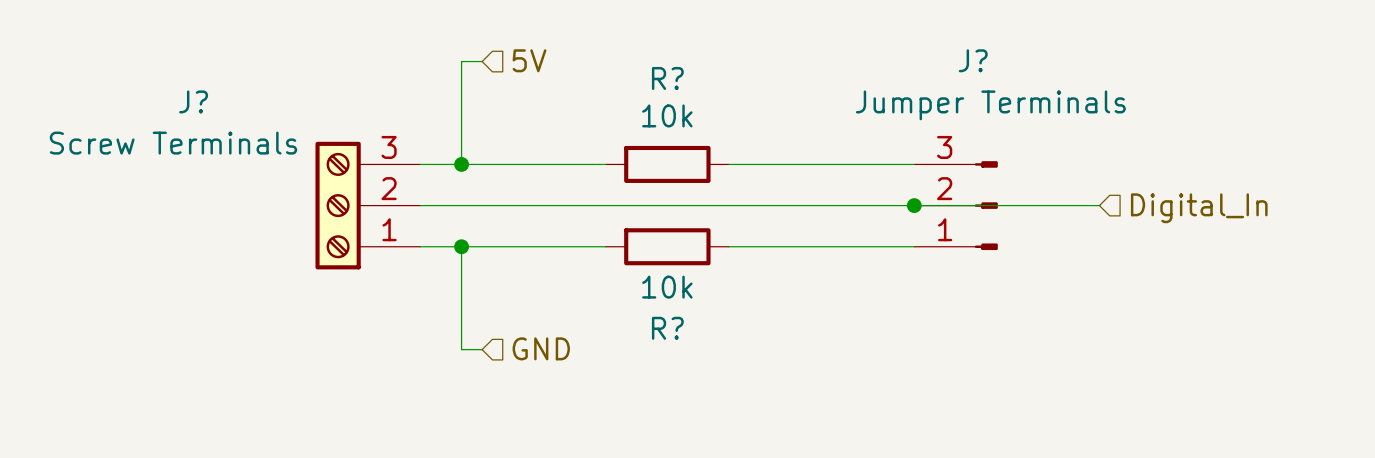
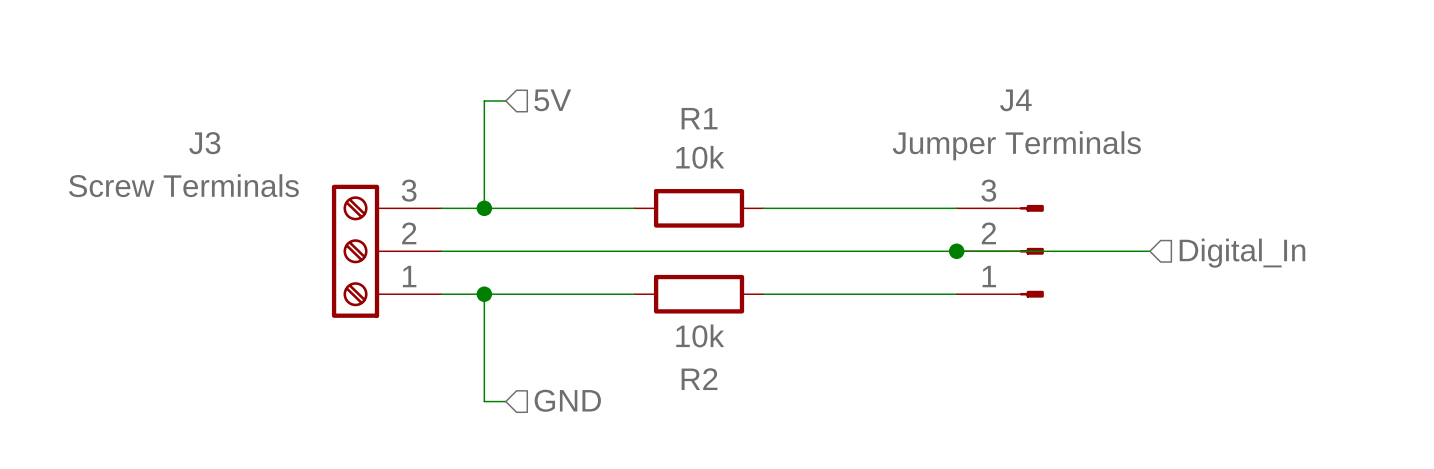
J? name: J? (973, 60) -> J4 (1015, 100)
R? name: R? (667, 78) -> R1 (699, 118)
J? name: J? (193, 101) -> J3 (204, 143)
R? name: R? (667, 328) -> R2 (699, 379)

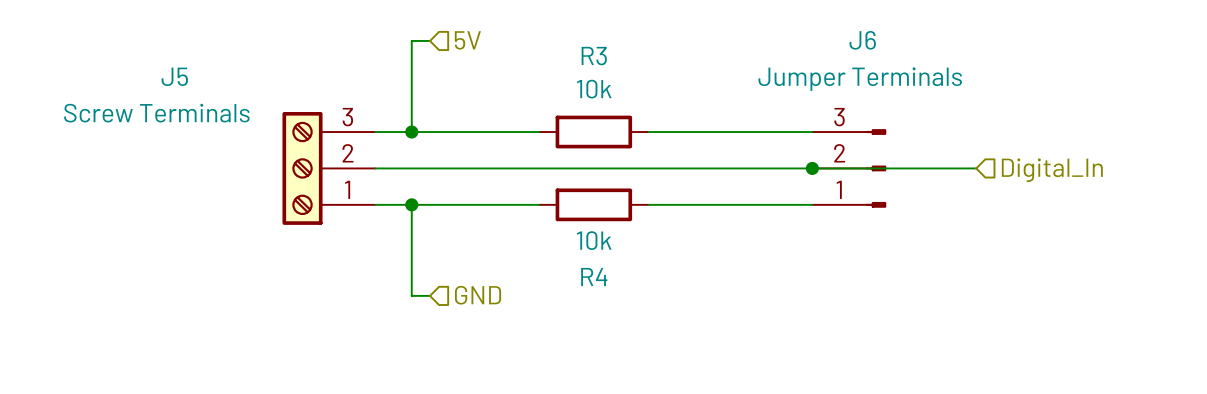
J4 name: J4 (1015, 100) -> J6 (862, 40)
R1 name: R1 (699, 118) -> R3 (594, 56)
J3 name: J3 (204, 143) -> J5 (174, 76)
R2 name: R2 (699, 379) -> R4 (594, 277)

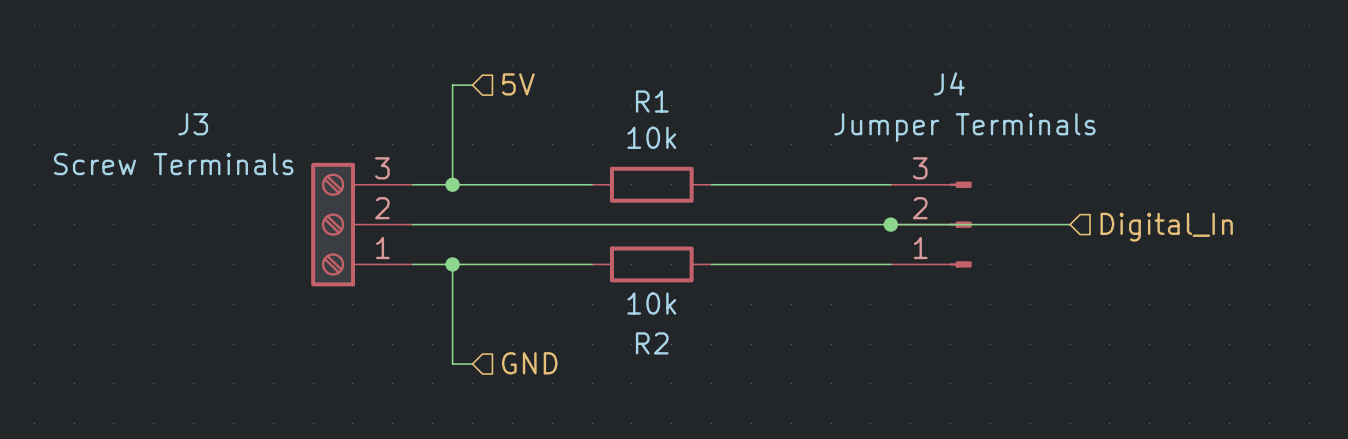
J6 name: J6 (862, 40) -> J4 (949, 83)
R3 name: R3 (594, 56) -> R1 (652, 101)
J5 name: J5 (174, 76) -> J3 (193, 124)
R4 name: R4 (594, 277) -> R2 (652, 343)

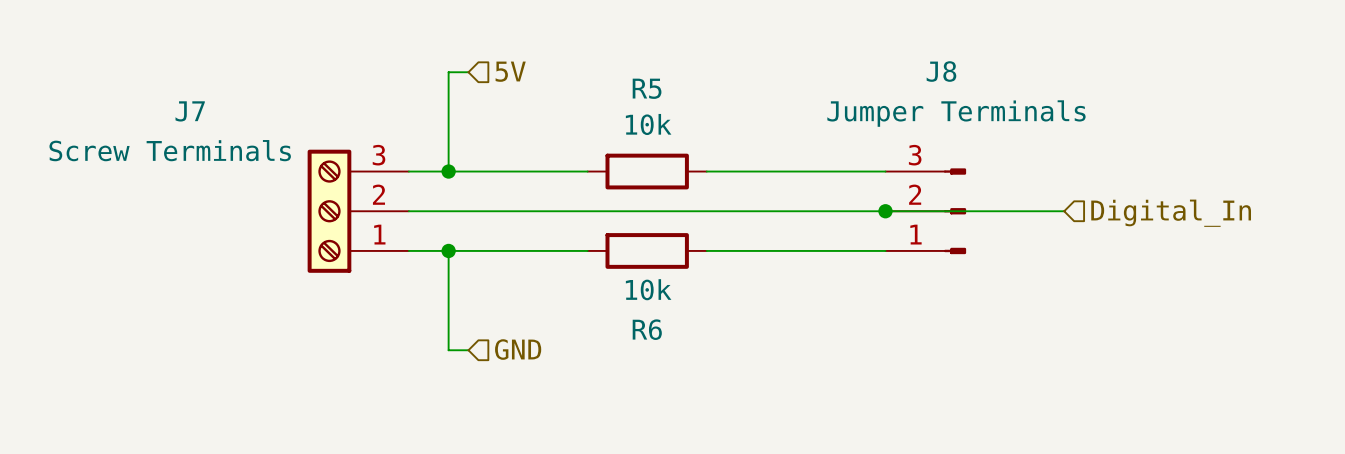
J4 name: J4 (949, 83) -> J8 (941, 71)
R1 name: R1 (652, 101) -> R5 (647, 88)
J3 name: J3 (193, 124) -> J7 (190, 111)
R2 name: R2 (652, 343) -> R6 (647, 329)

